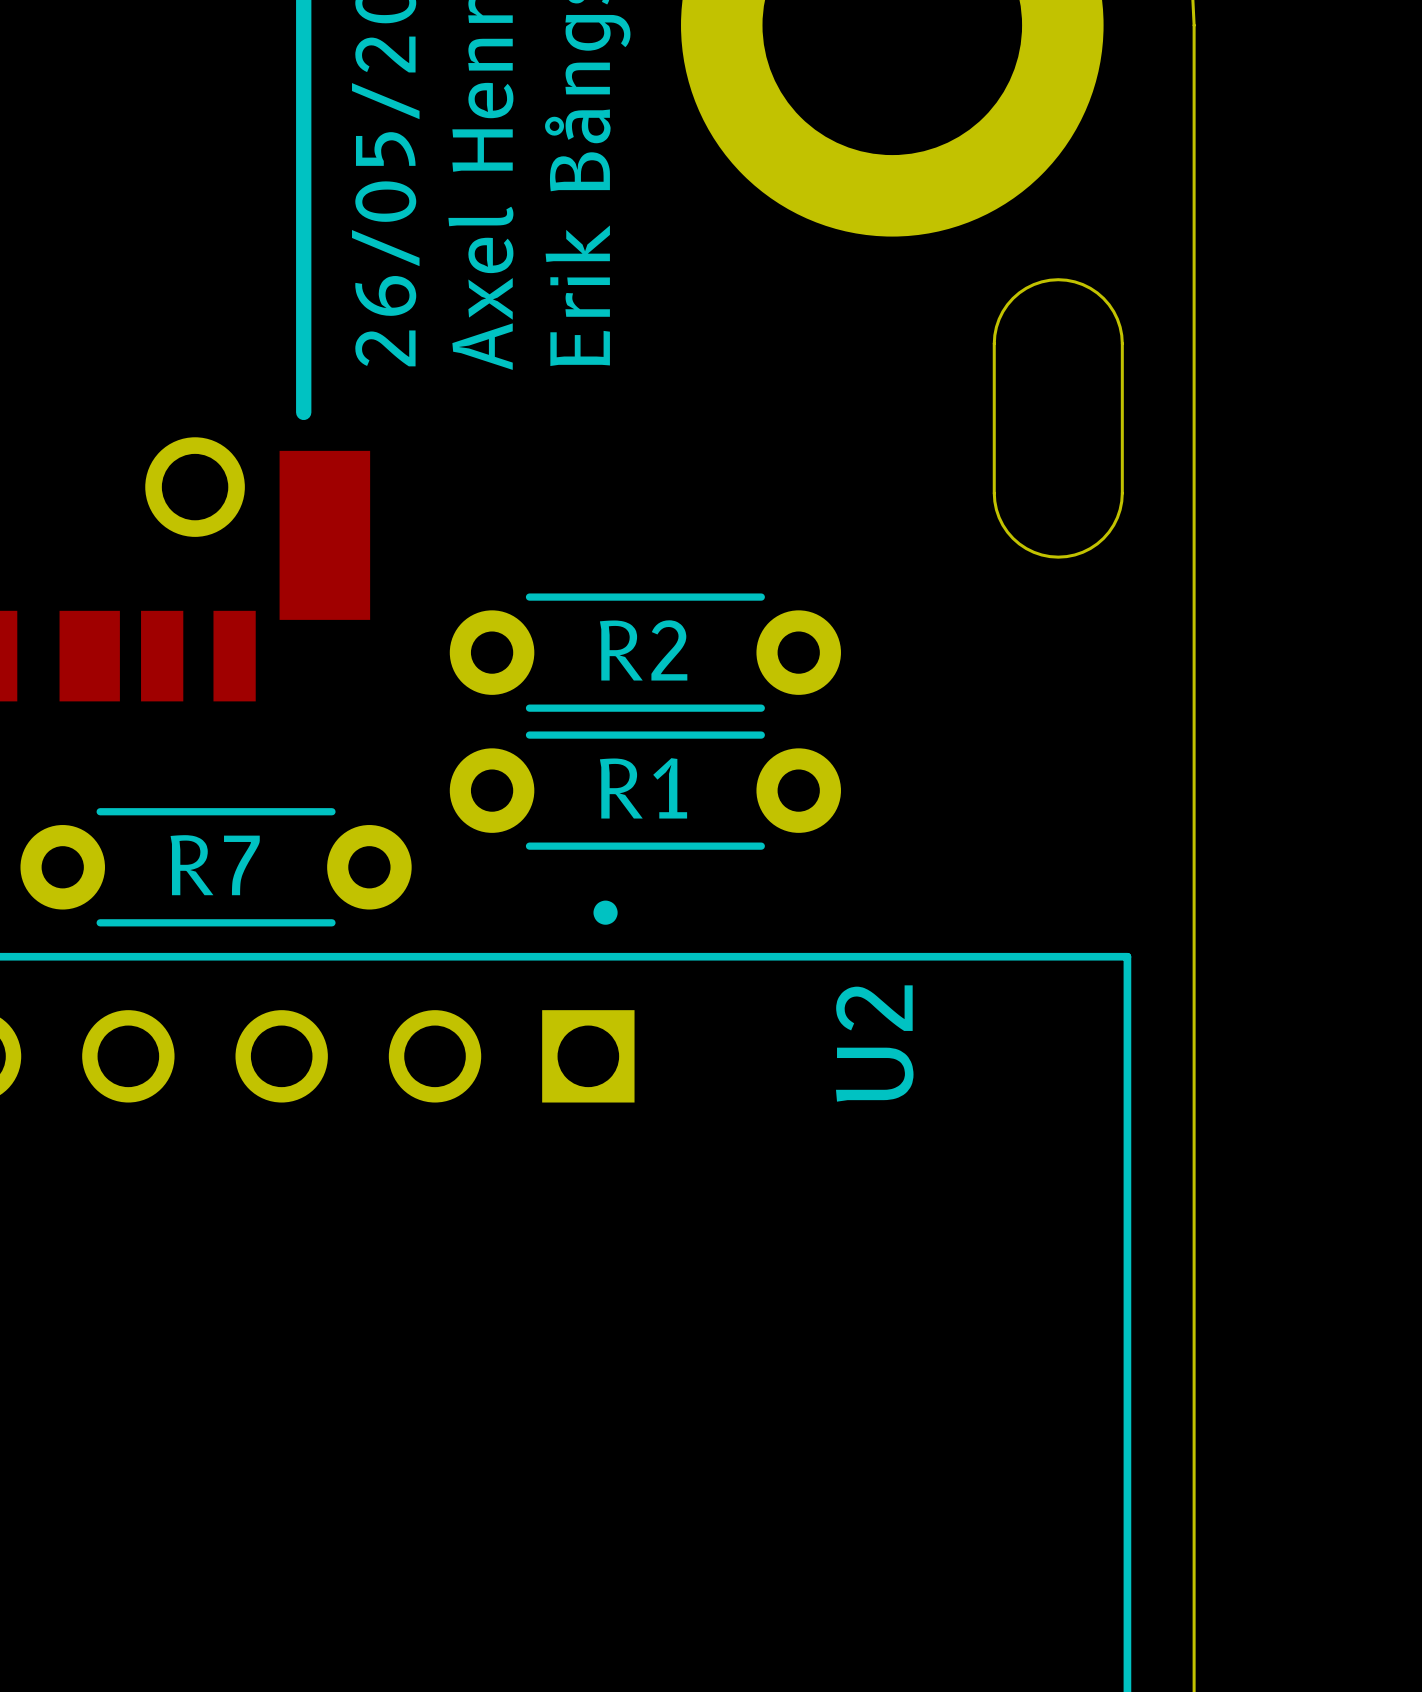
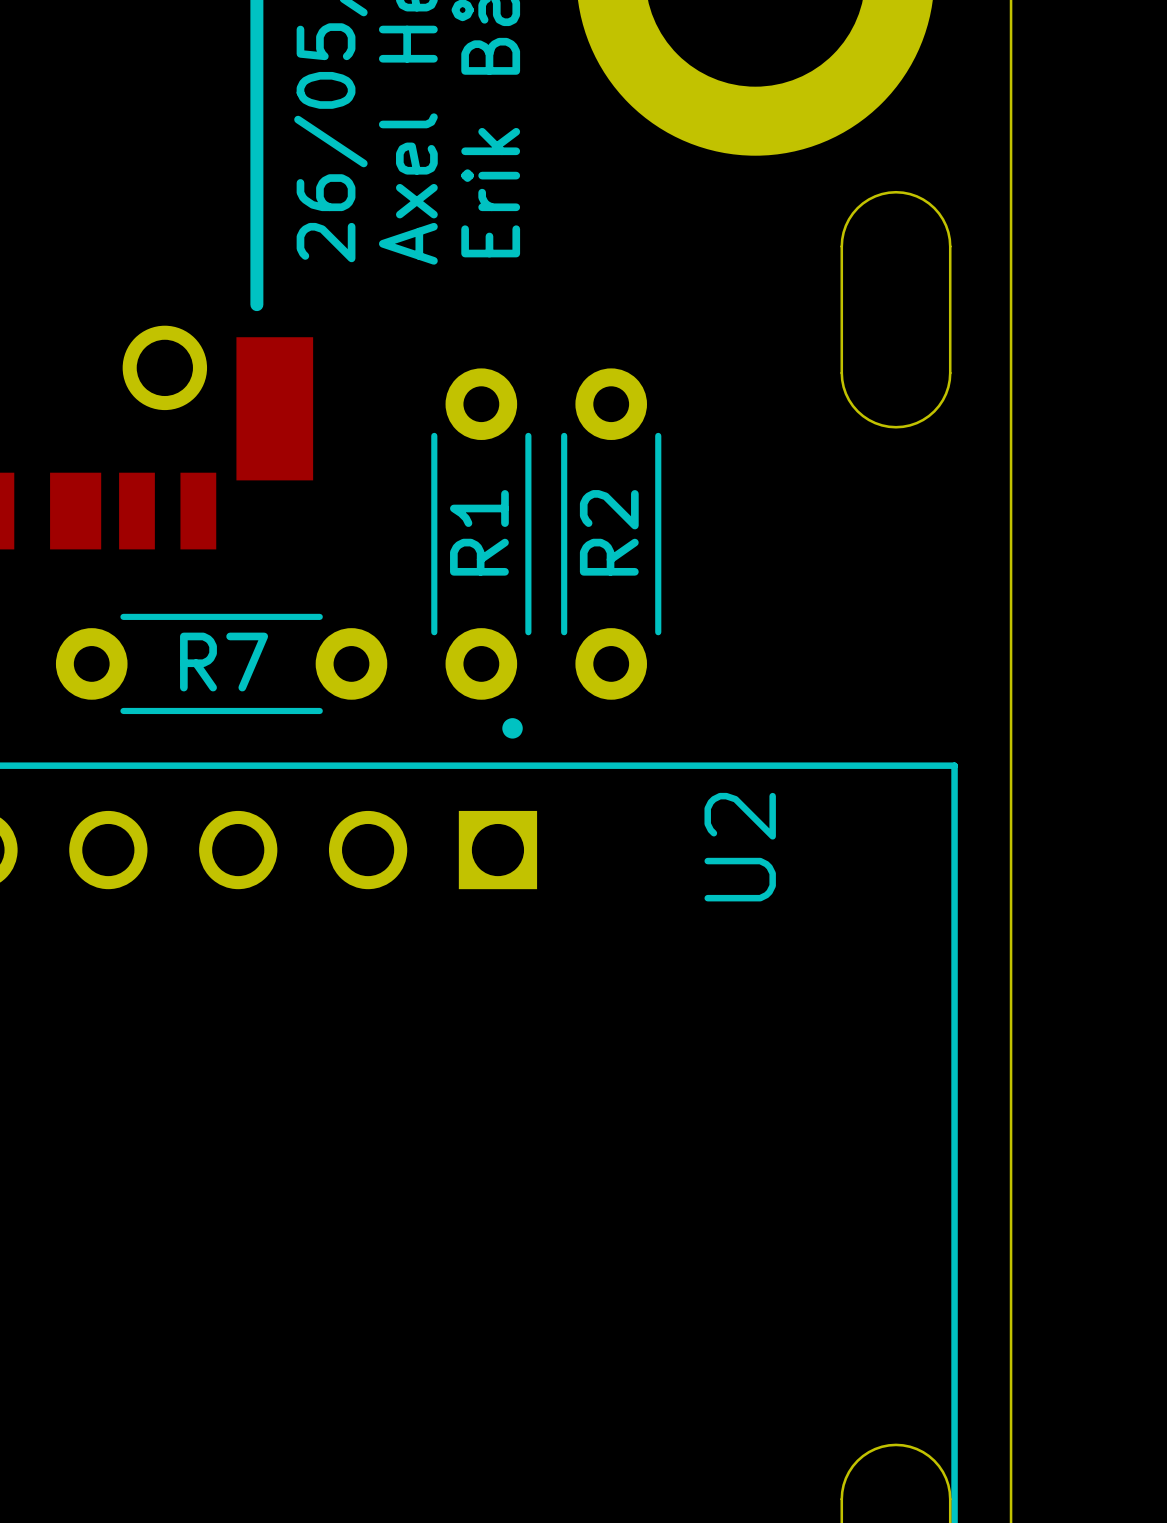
R2 rotation: 0° (645, 652) -> 90° clockwise (611, 534)
R1 rotation: 0° (645, 790) -> 90° clockwise (481, 534)
R7 position: (216, 867) -> (221, 663)

